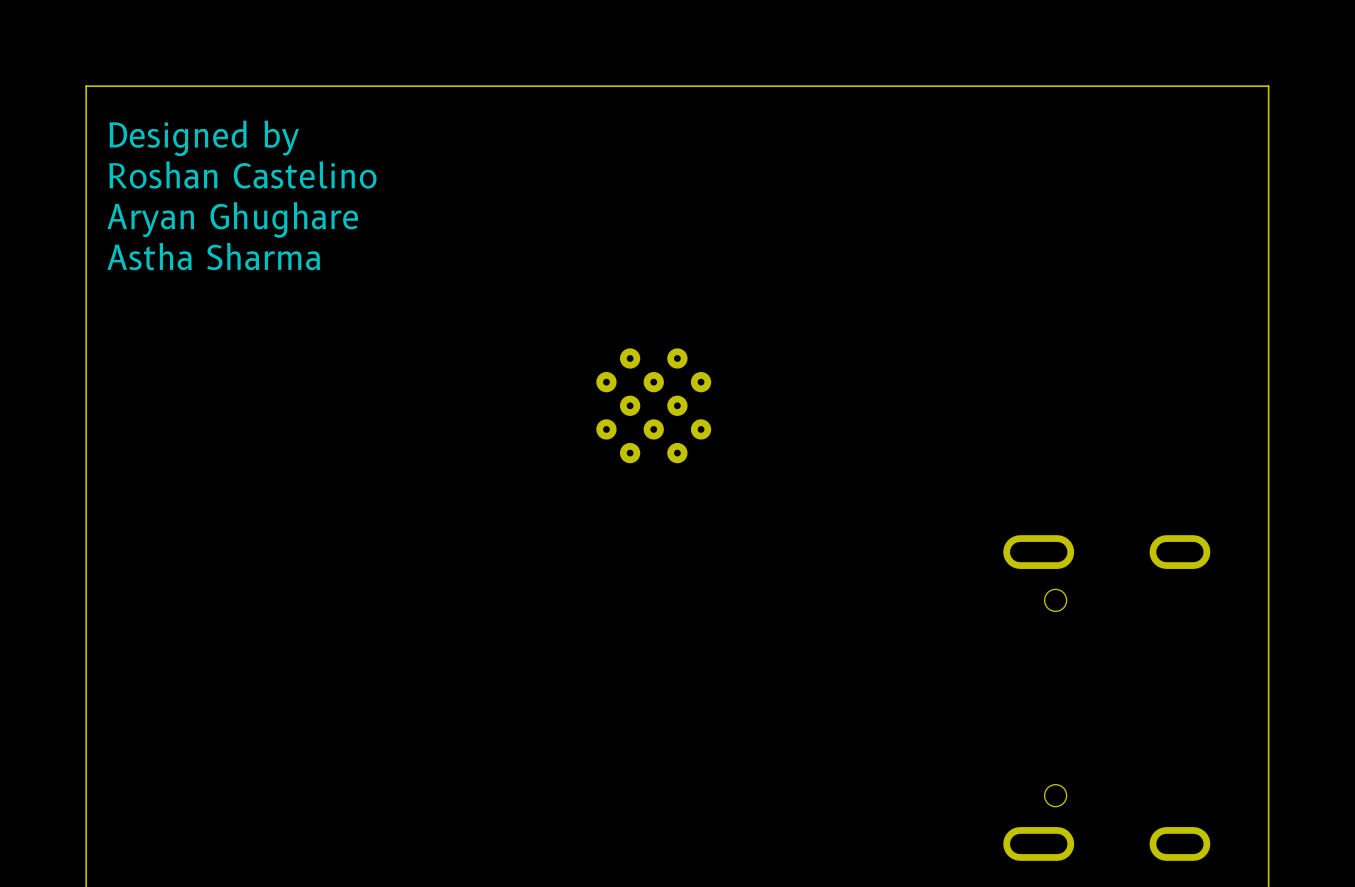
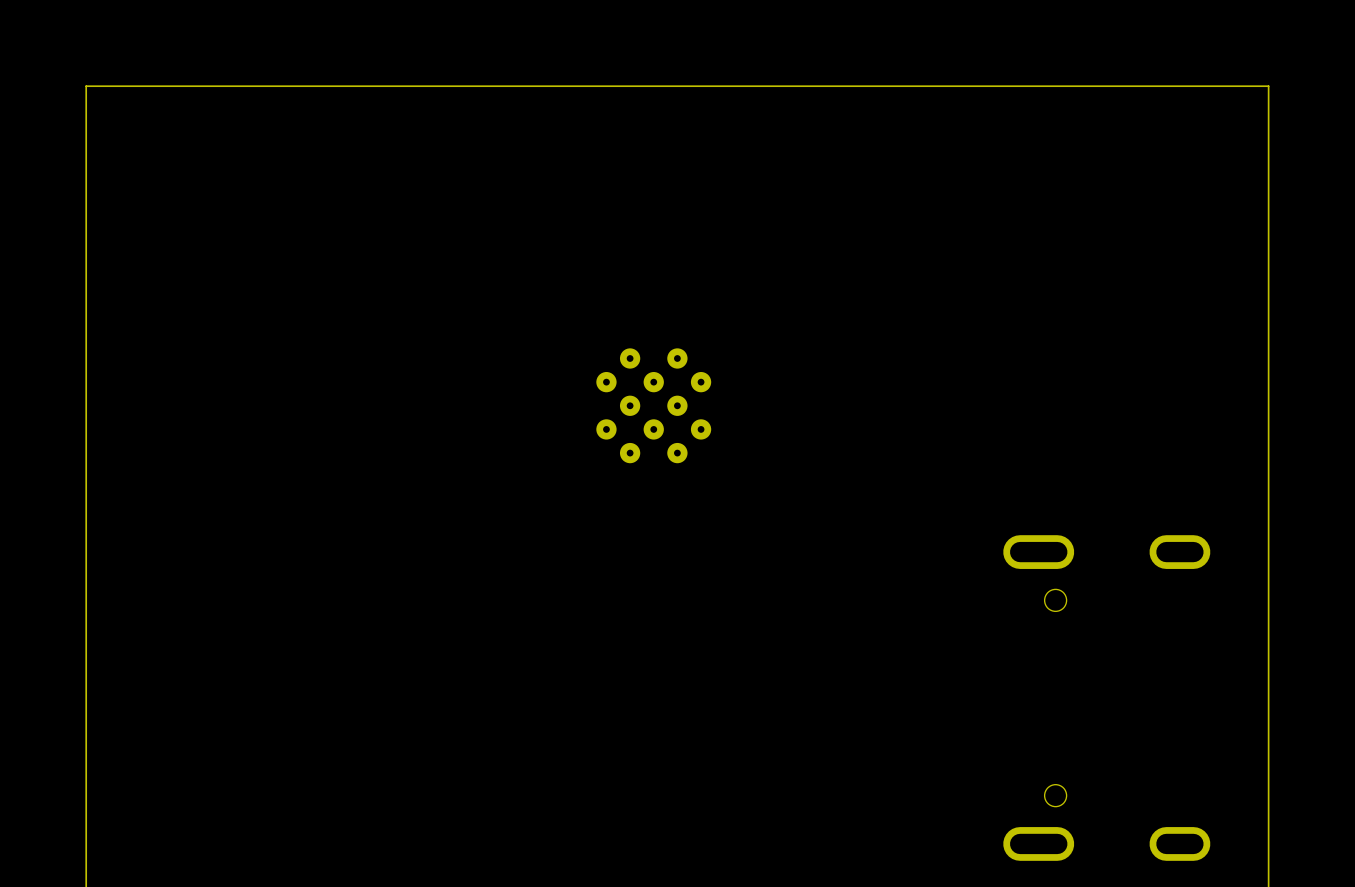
text: Designed by (204, 138) -> none
text: Roshan Castelino (242, 174) -> none
text: Aryan Ghughare (232, 219) -> none
text: Astha Sharma (213, 256) -> none

